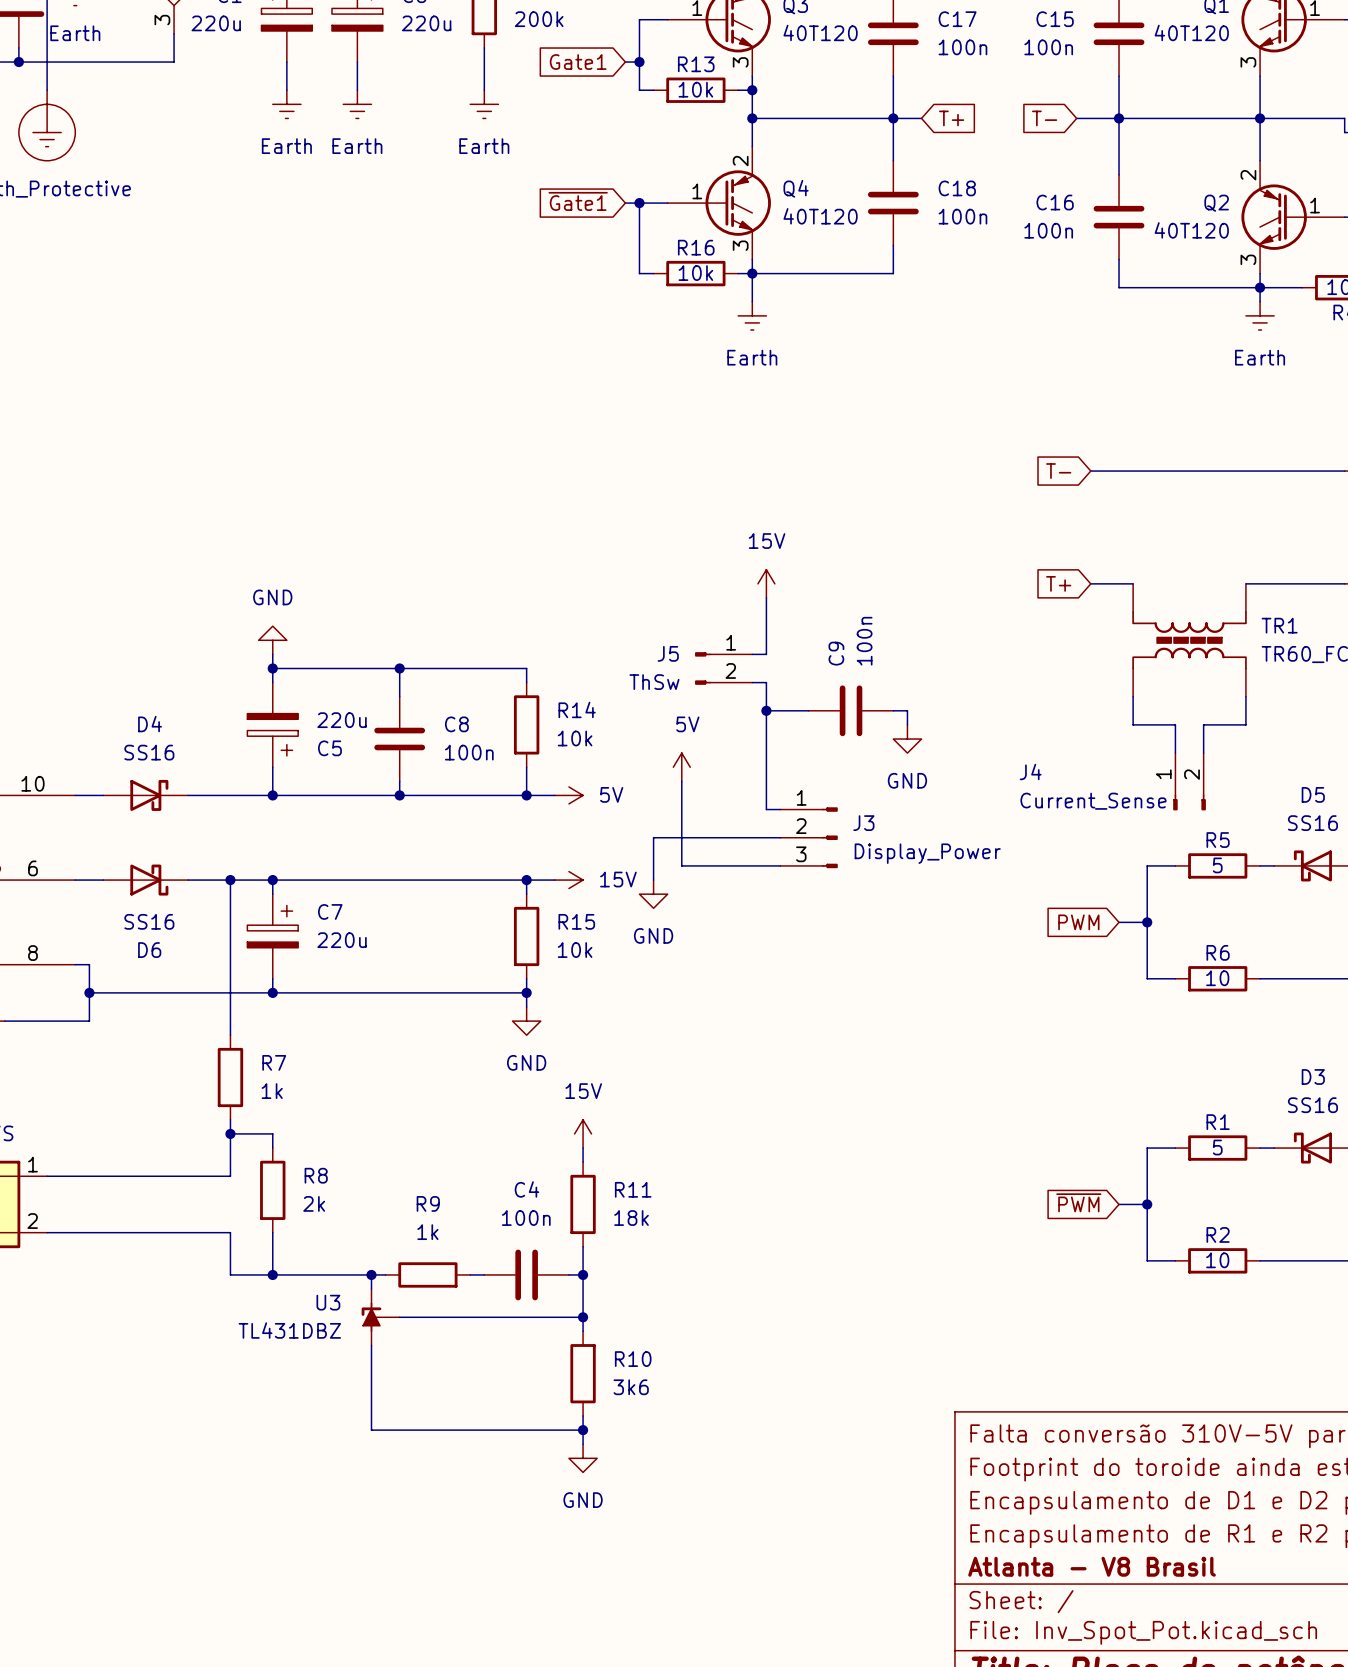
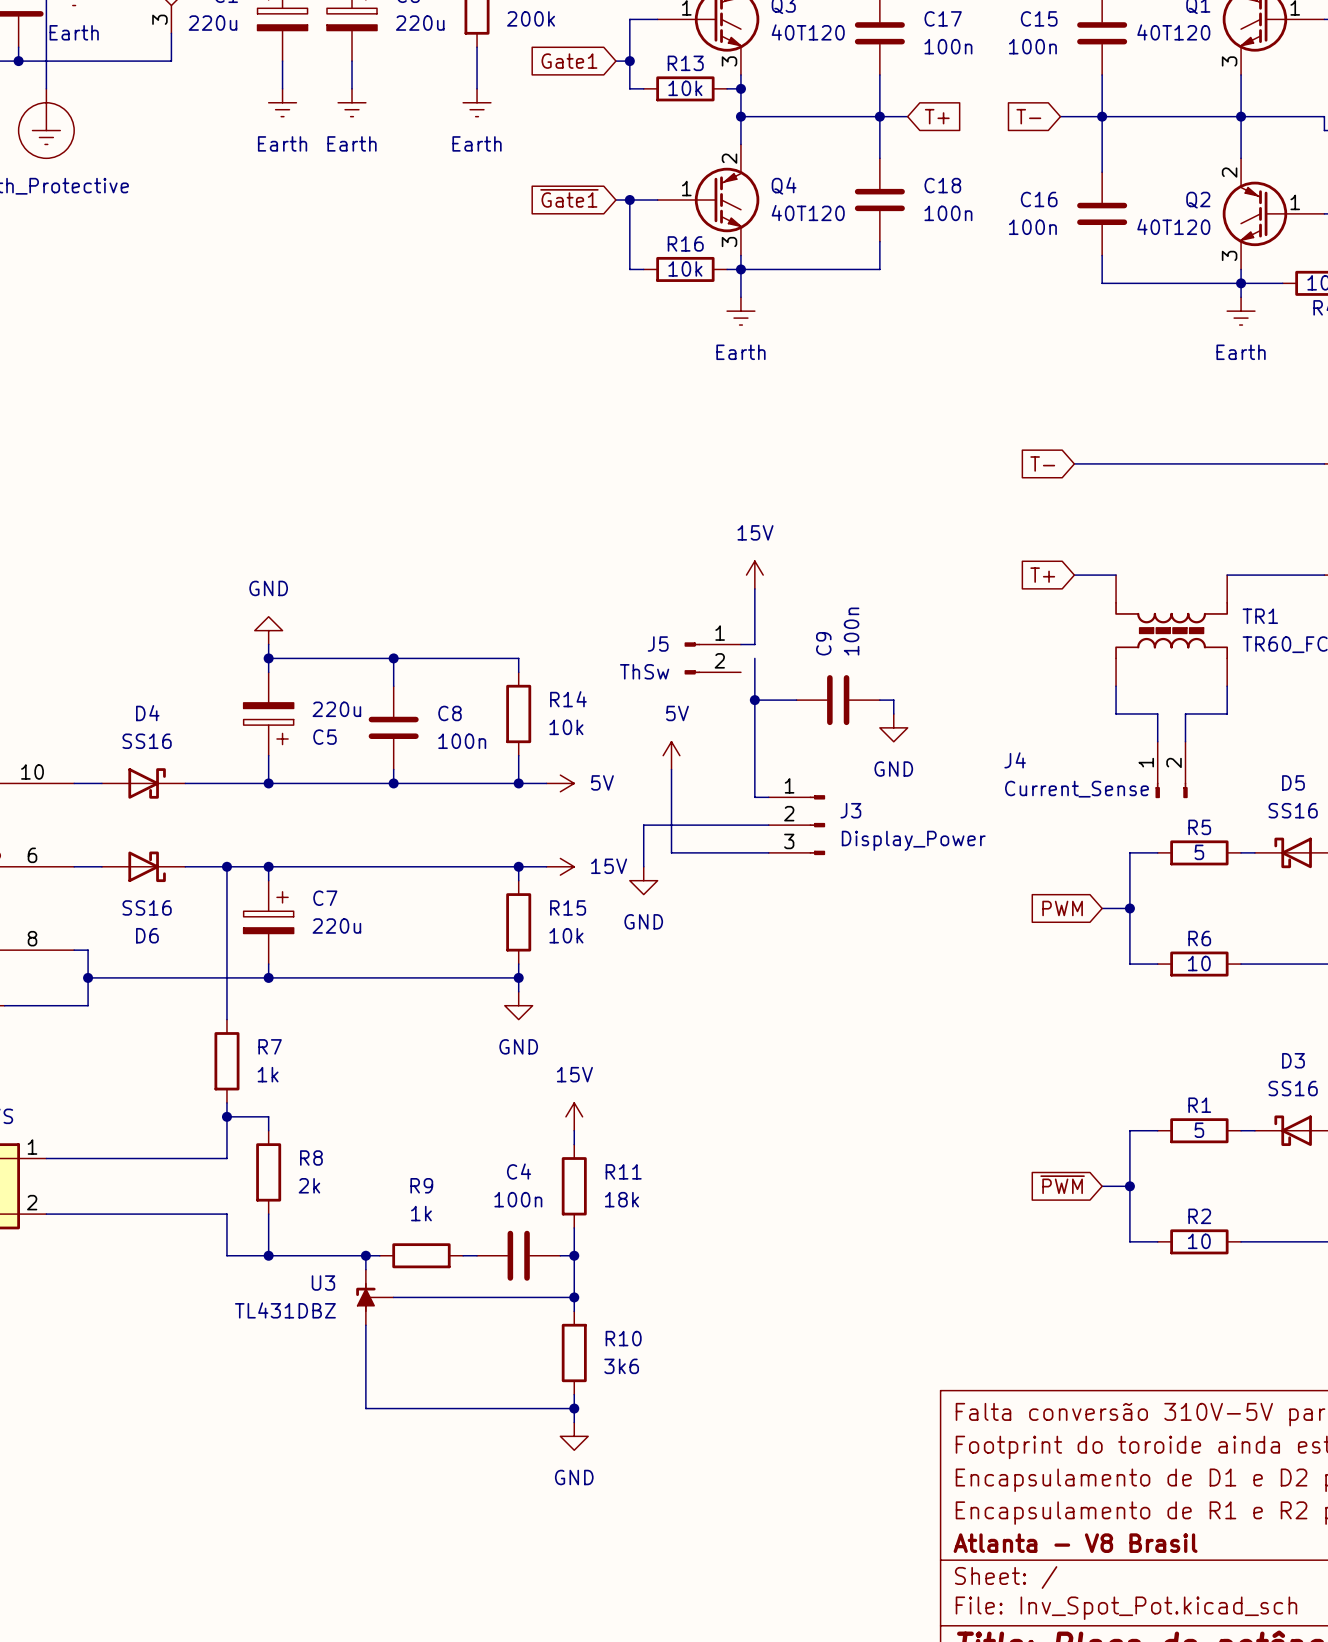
wire: (752, 682) (766, 682) -> (754, 658) (754, 672)

